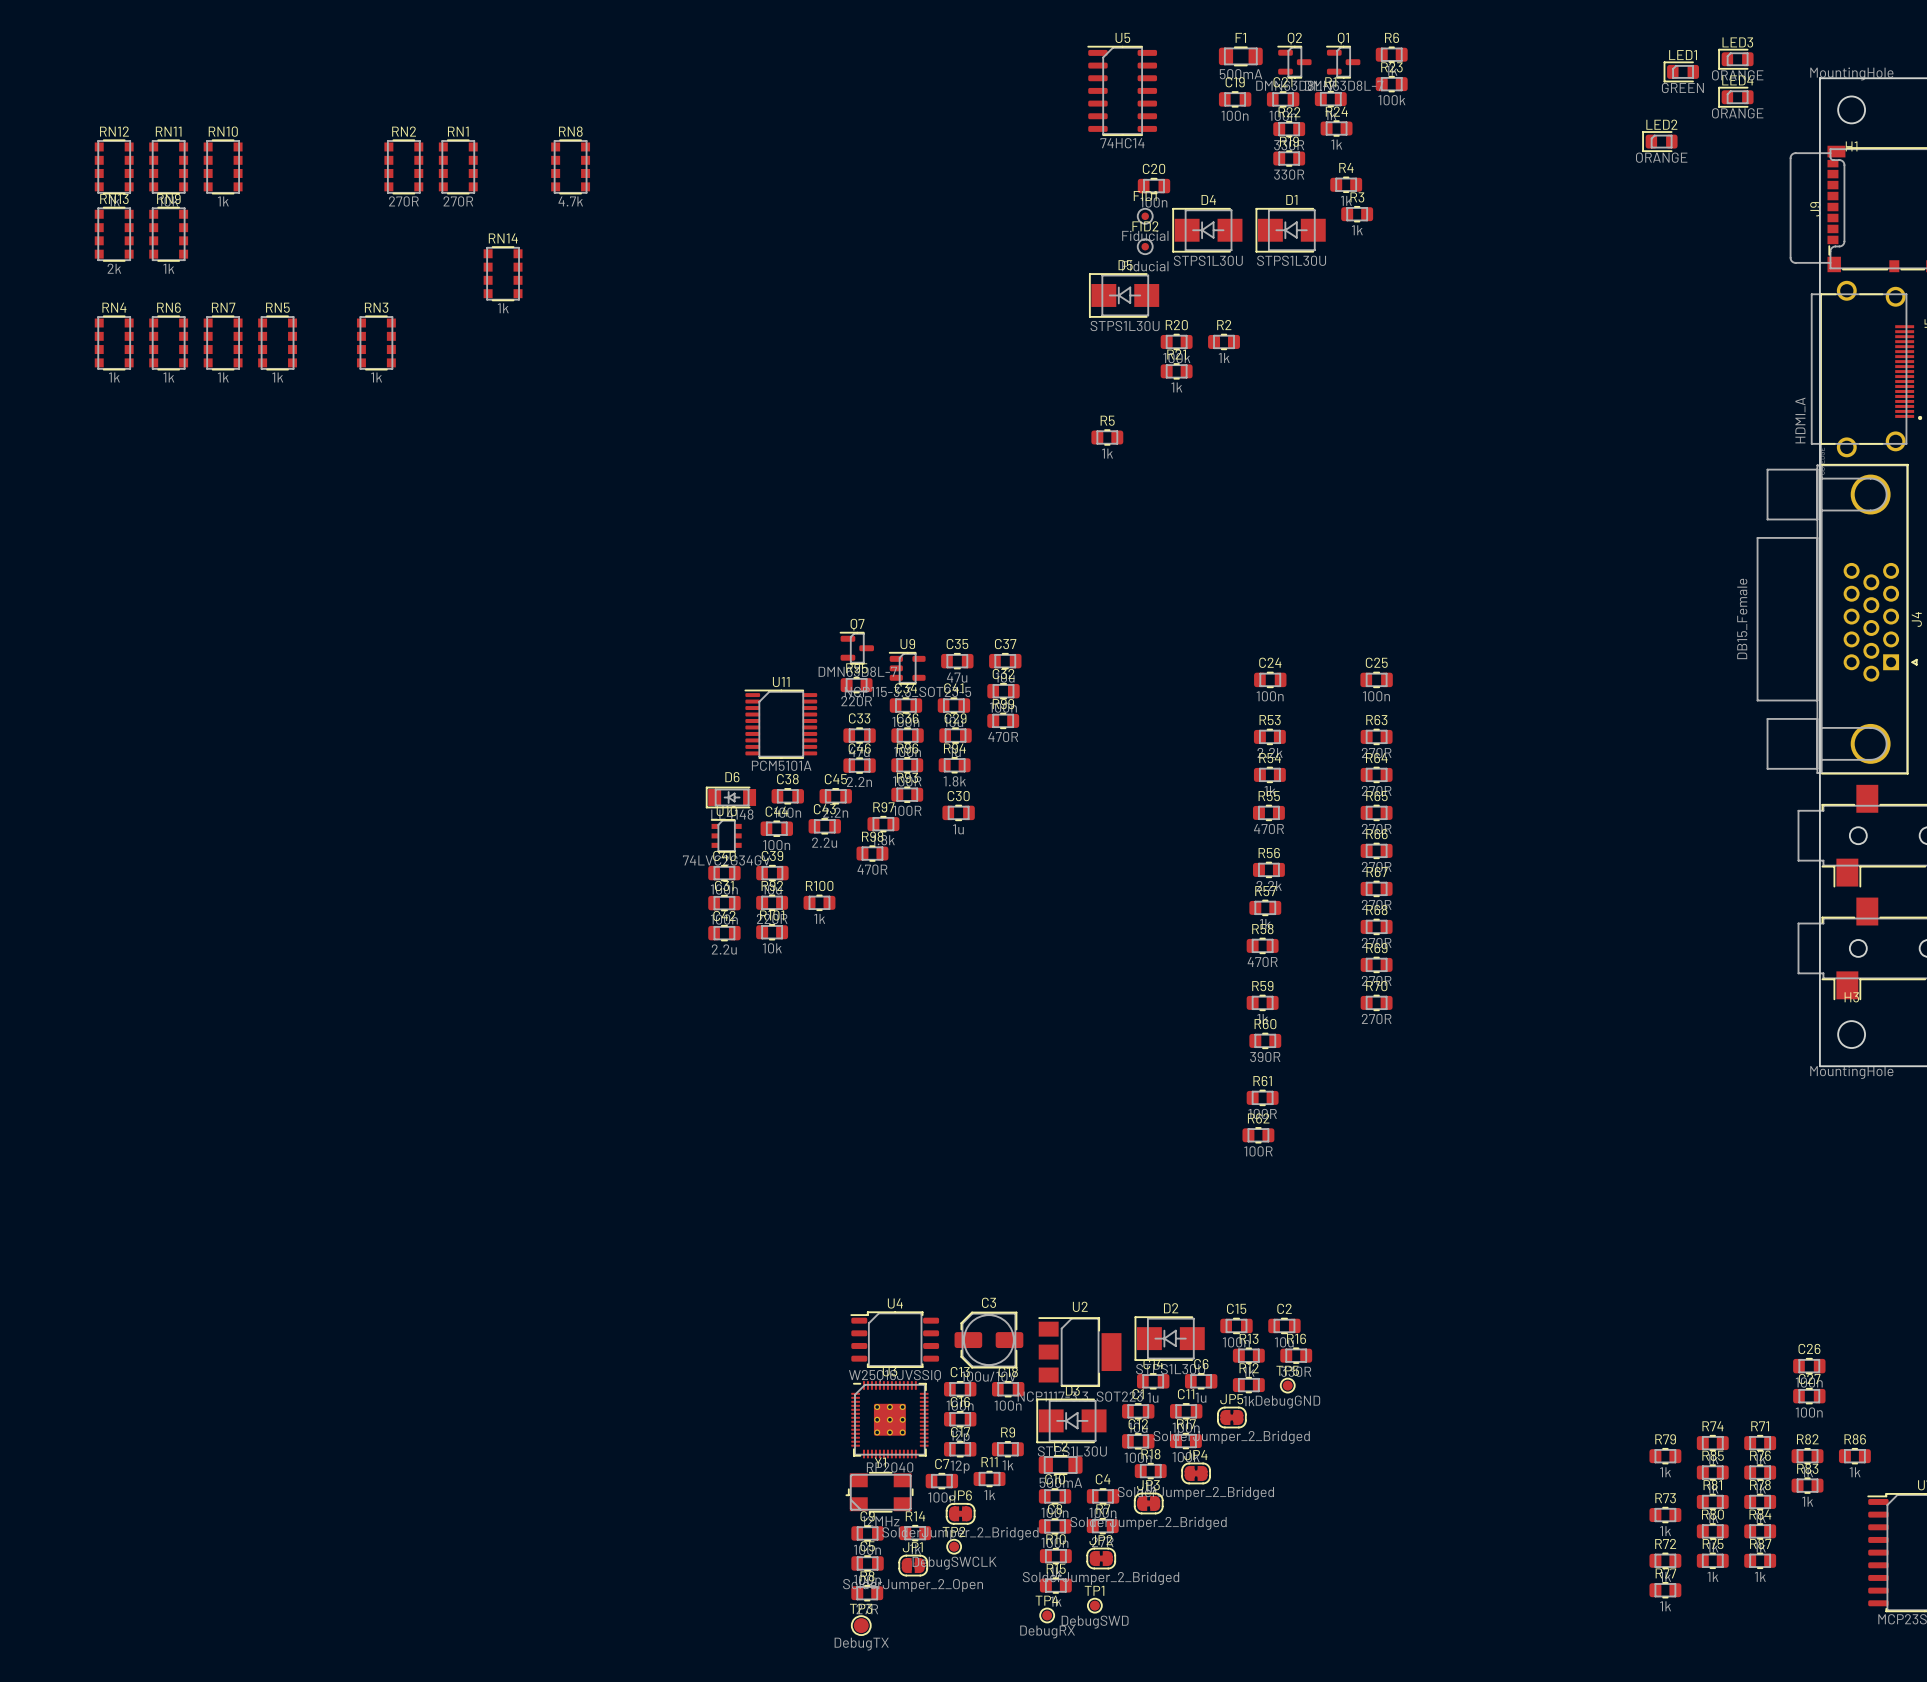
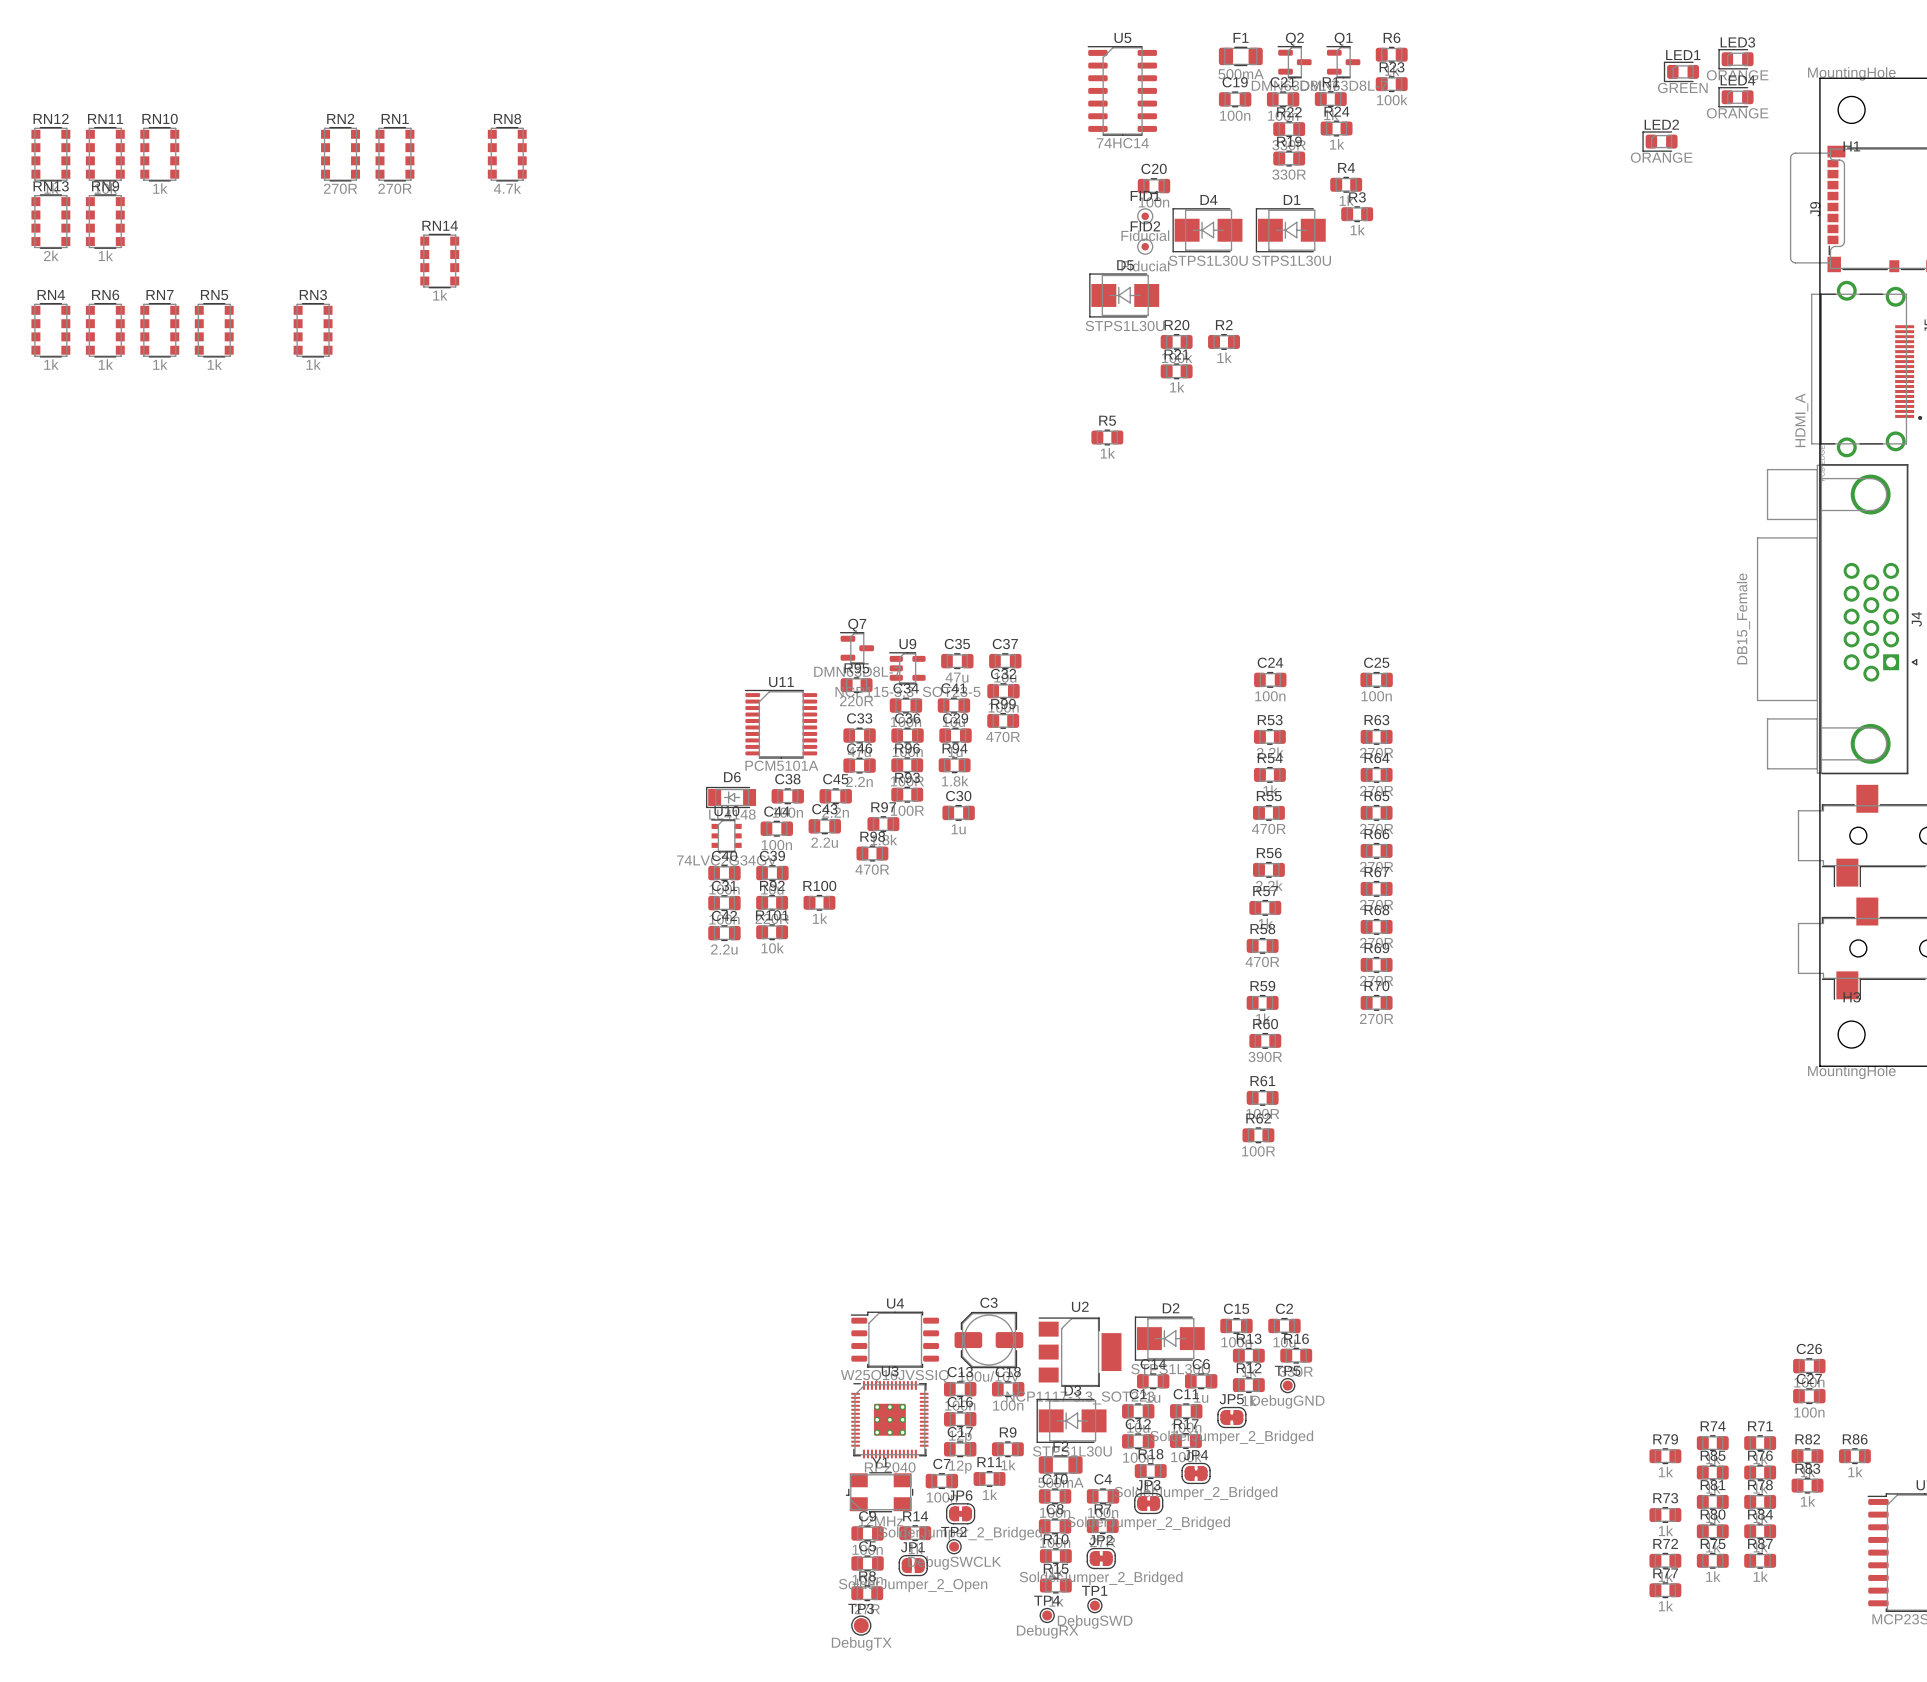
RN12 position: (114, 166) -> (50, 154)
RN11 position: (168, 166) -> (105, 154)
RN10 position: (223, 166) -> (159, 154)
RN2 position: (403, 166) -> (340, 154)
RN1 position: (458, 166) -> (394, 154)
RN8 position: (570, 166) -> (507, 154)
RN13 position: (114, 234) -> (50, 221)
RN9 position: (168, 234) -> (105, 221)
RN14 position: (503, 273) -> (439, 261)
RN4 position: (114, 342) -> (50, 330)
RN6 position: (168, 342) -> (105, 330)
RN7 position: (223, 342) -> (159, 330)
RN5 position: (277, 342) -> (214, 330)
RN3 position: (376, 342) -> (313, 330)

